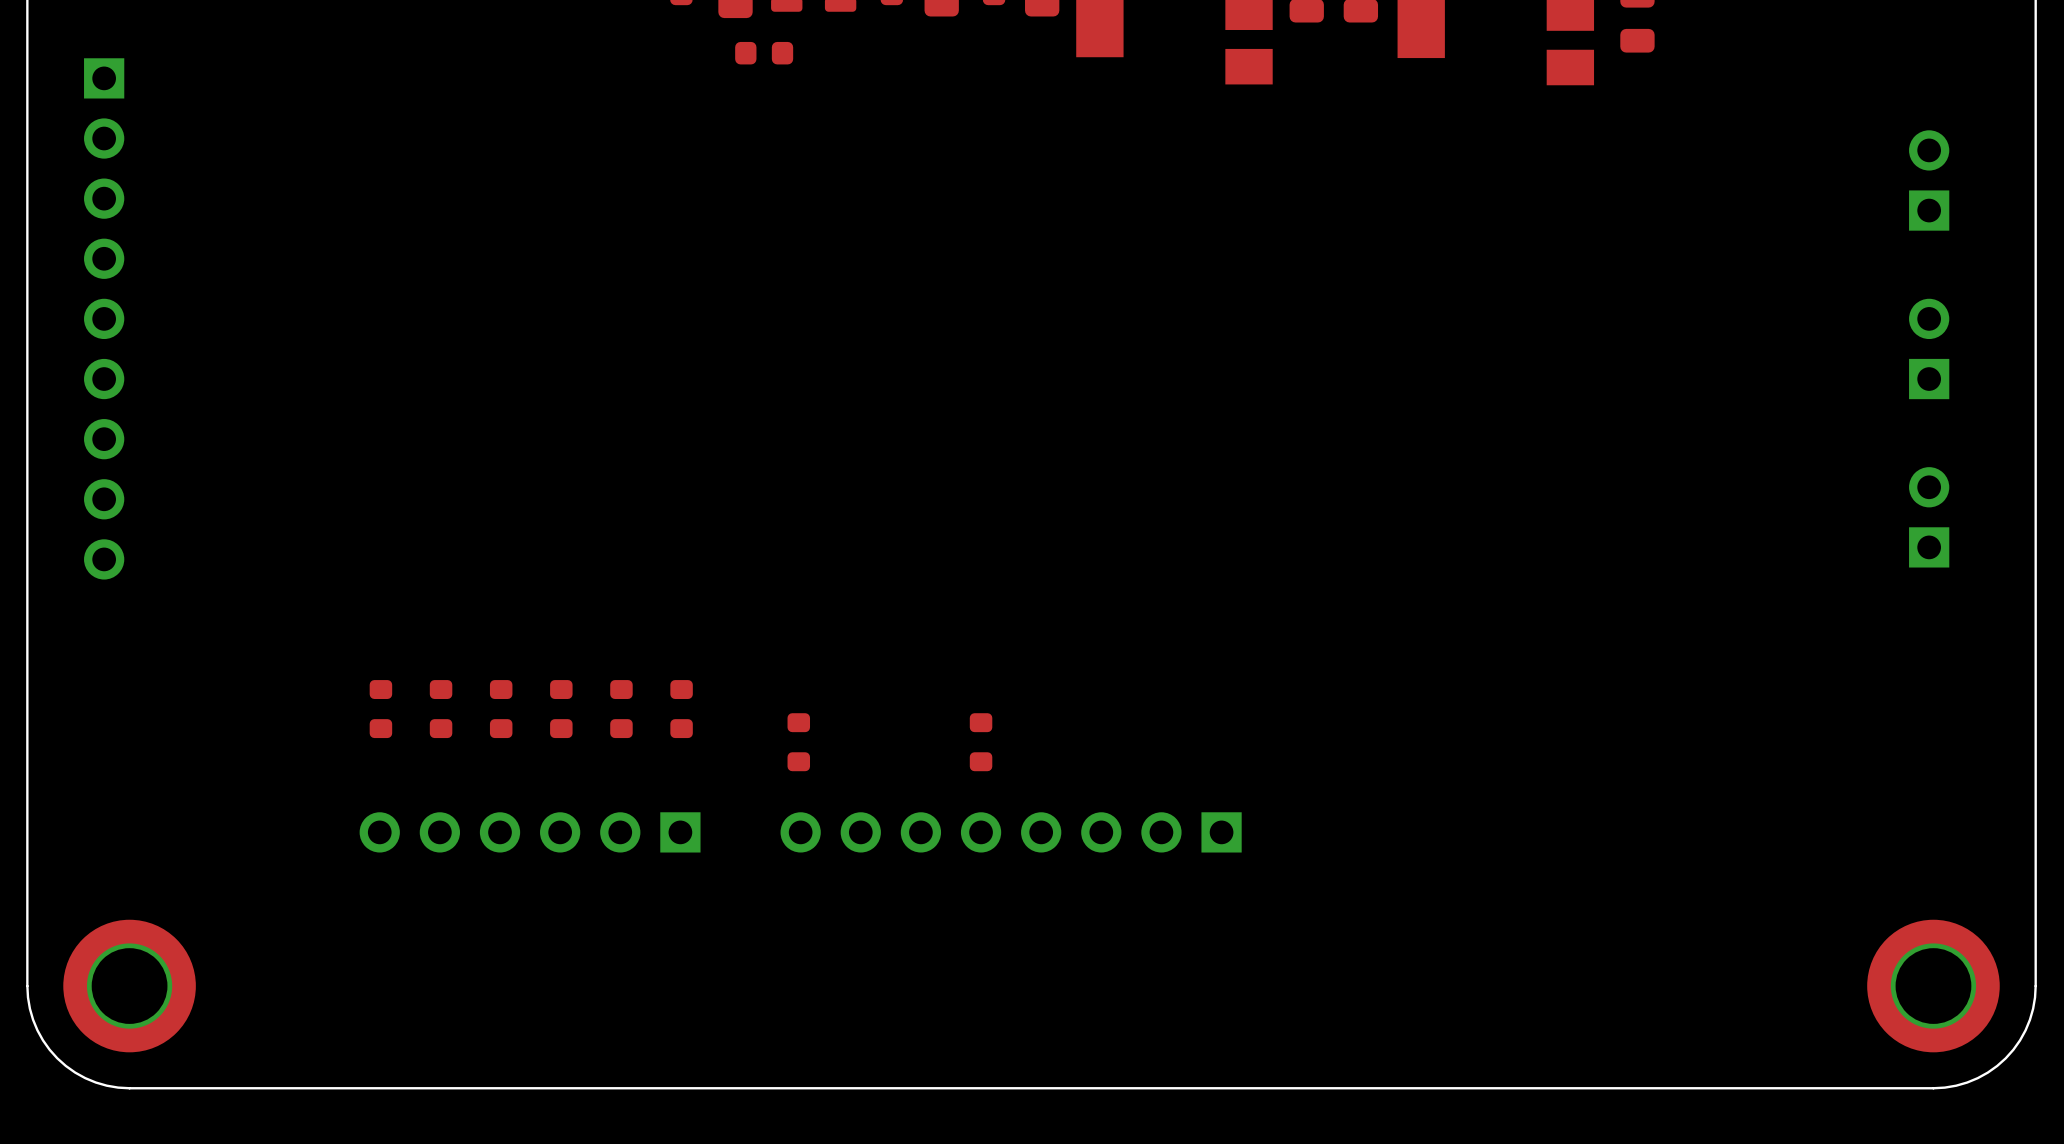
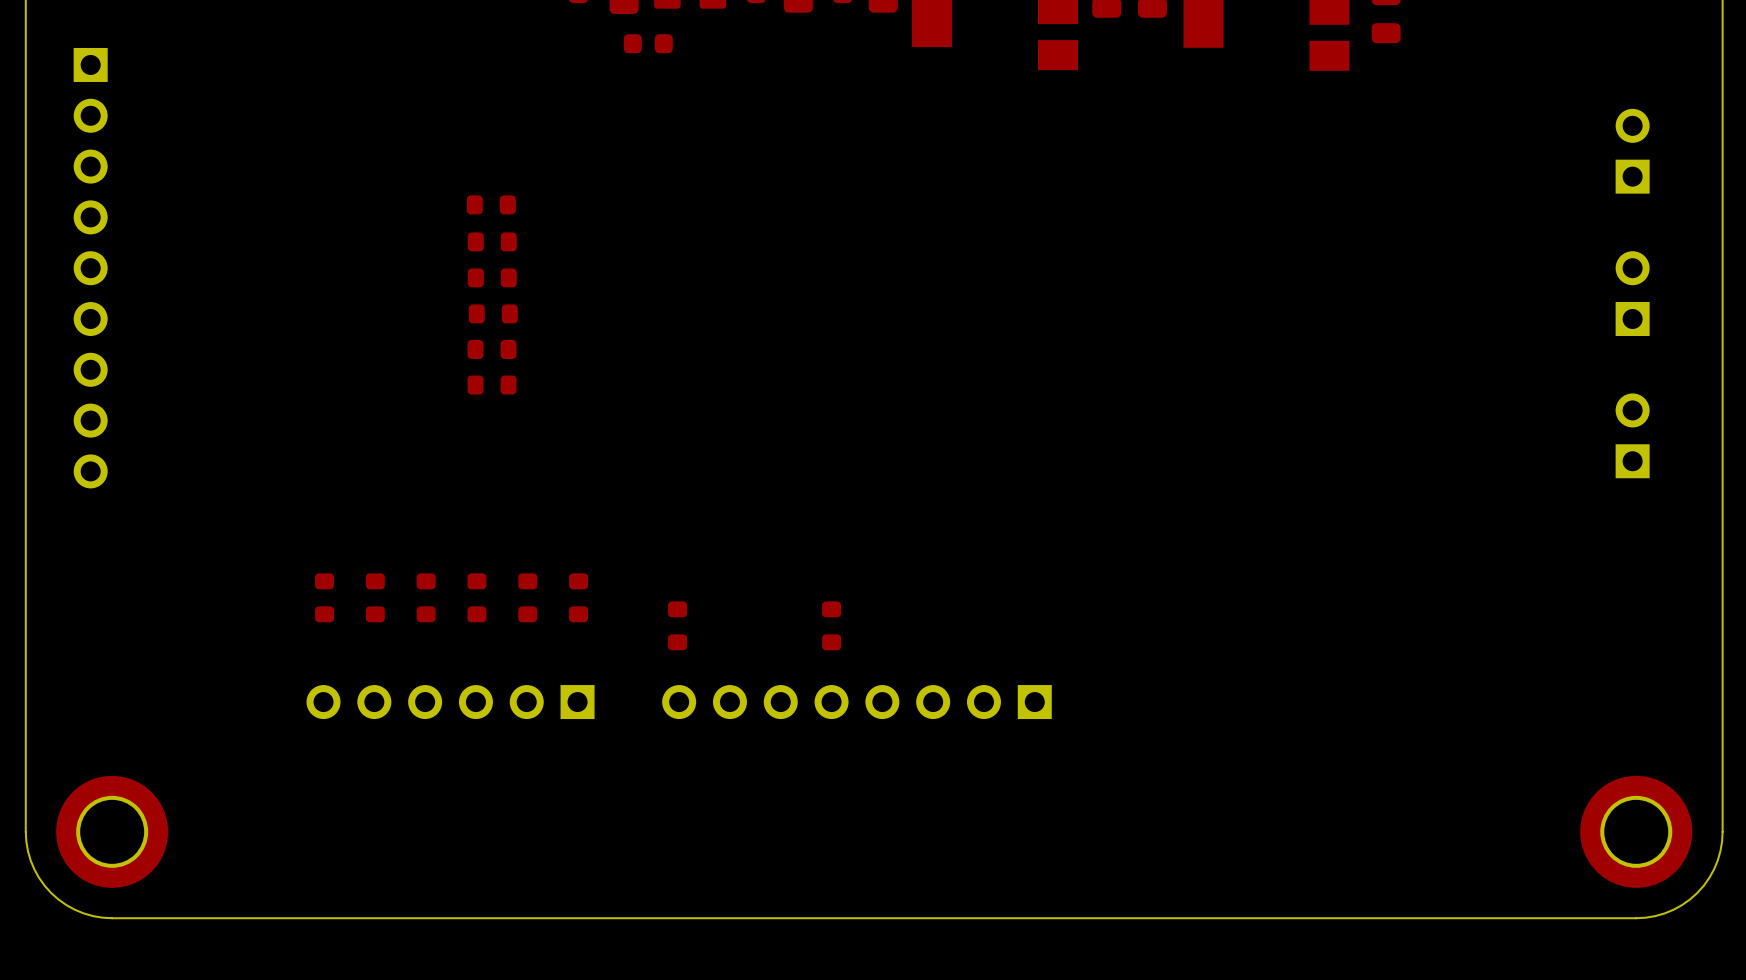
part: none -> (491, 204)
part: none -> (492, 241)
part: none -> (492, 277)
part: none -> (493, 313)
part: none -> (492, 349)
part: none -> (492, 385)

